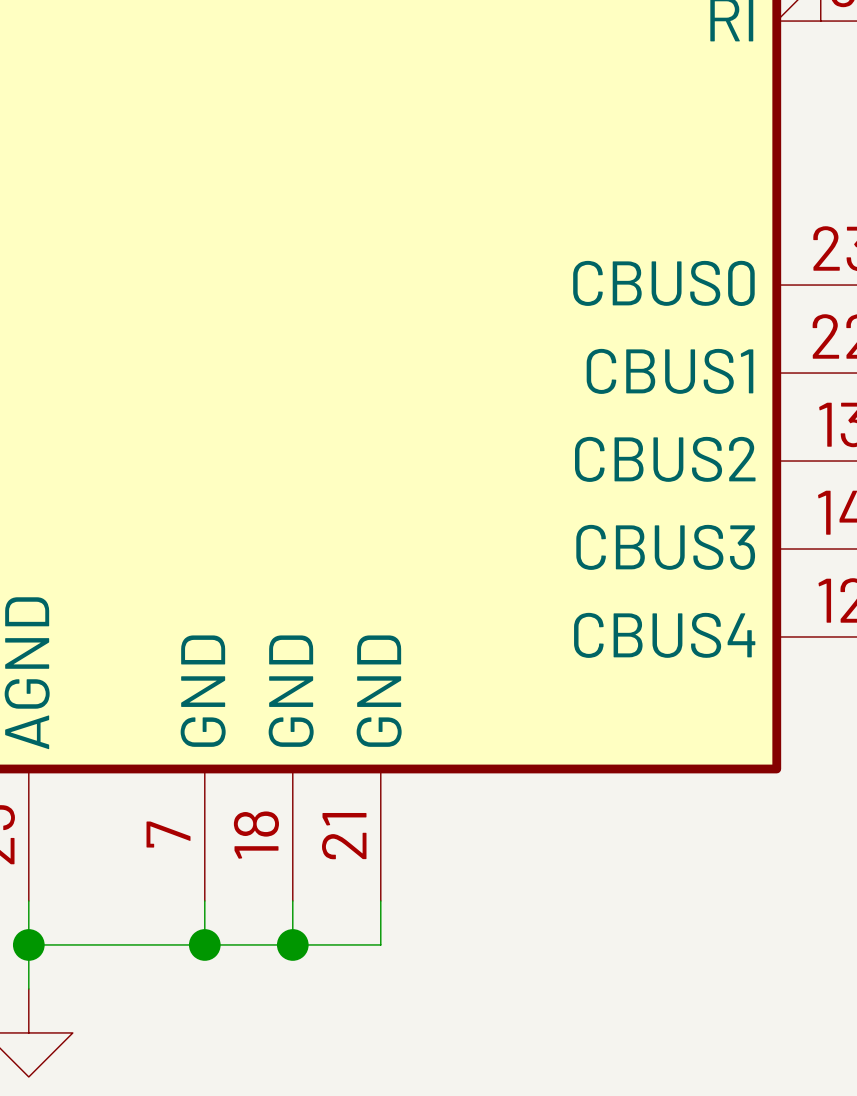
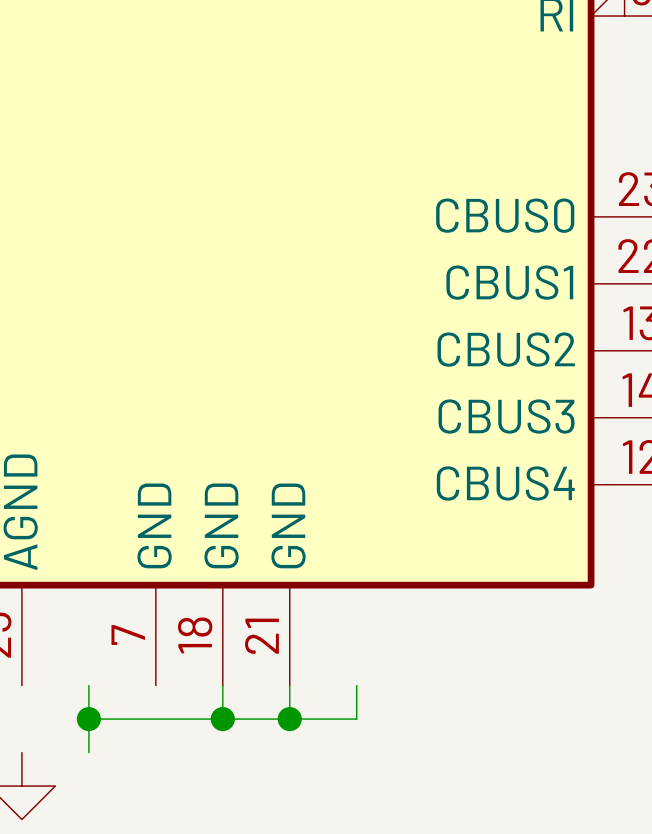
wire: (28, 900) (28, 988) -> (88, 685) (88, 752)
wire: (204, 900) (204, 944) -> none
wire: none -> (356, 685) (356, 719) (289, 719)
wire: (28, 944) (116, 944) -> none
junction: (28, 944) -> none
junction: none -> (88, 719)
junction: (204, 944) -> none
junction: none -> (289, 719)

